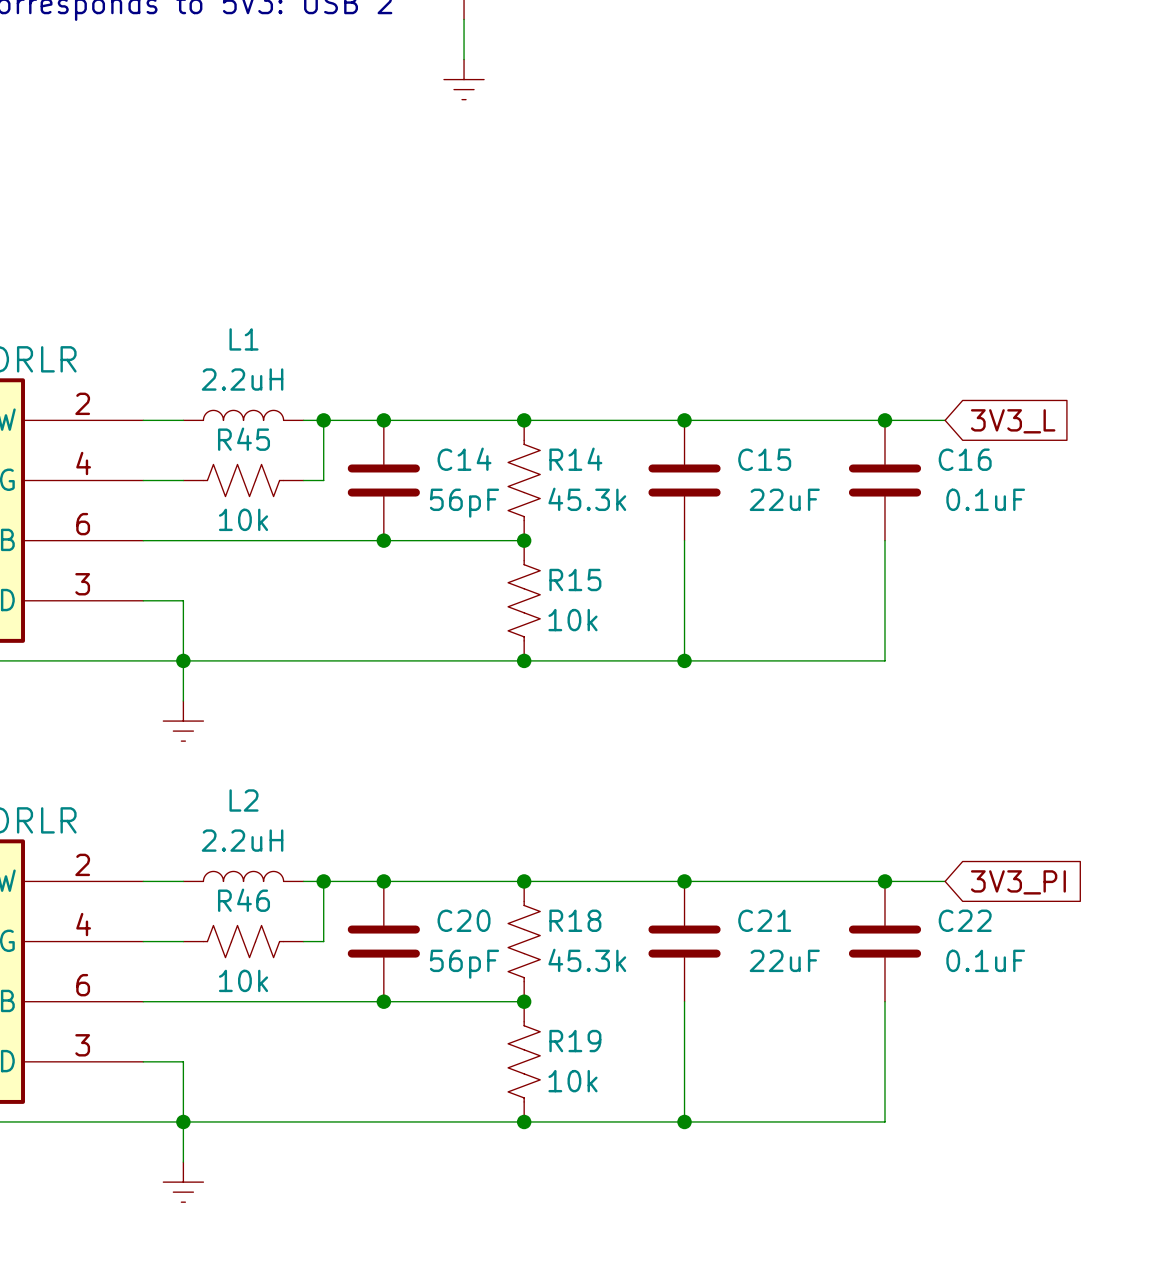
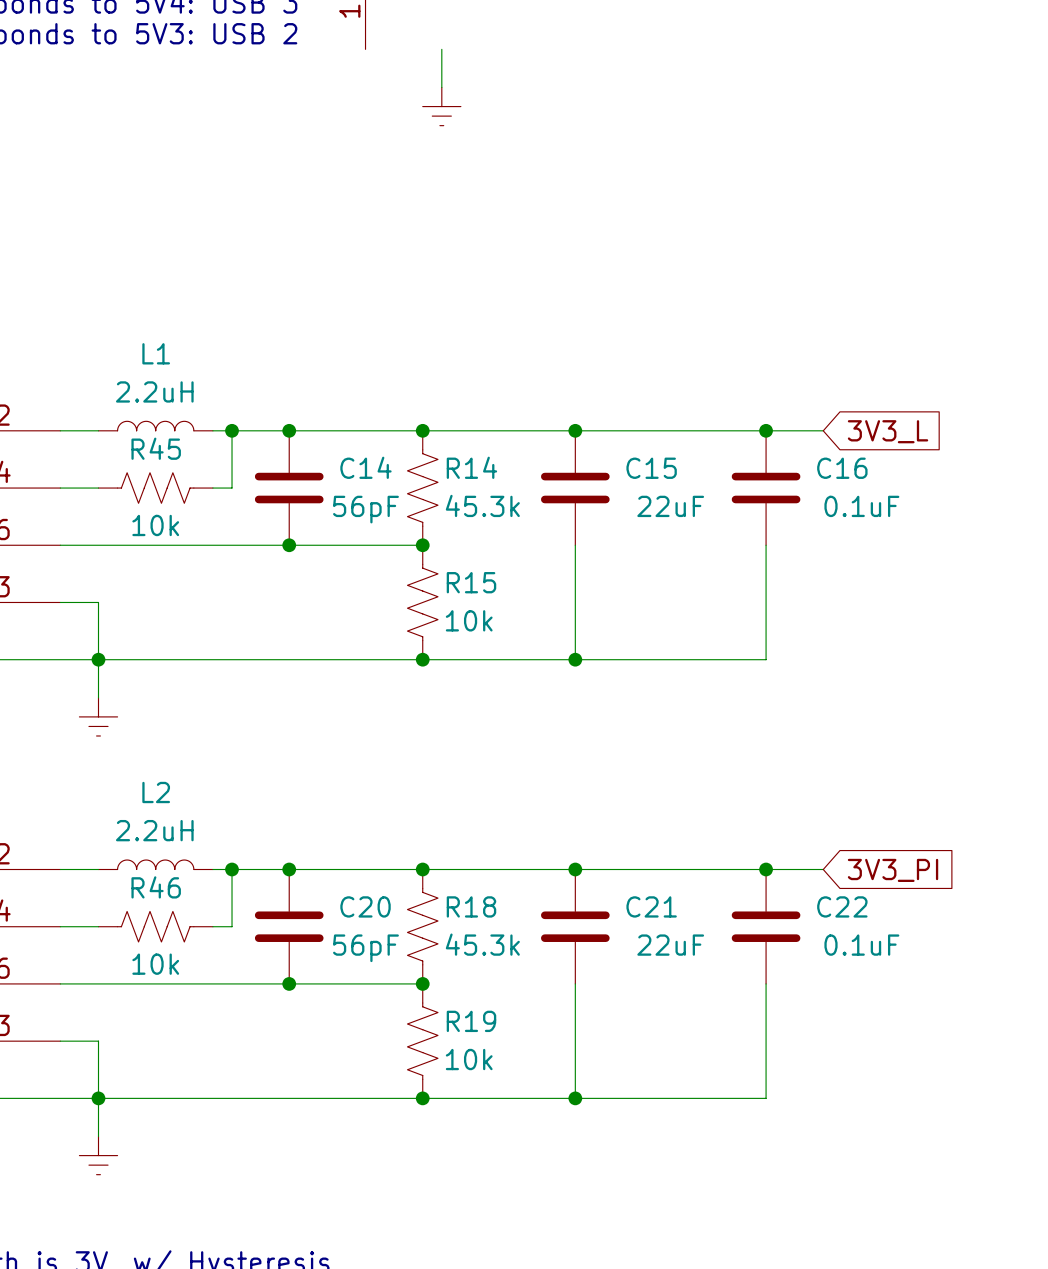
wire: (464, 19) (464, 59) -> (441, 49) (441, 87)
power symbol position: (464, 79) -> (441, 106)

